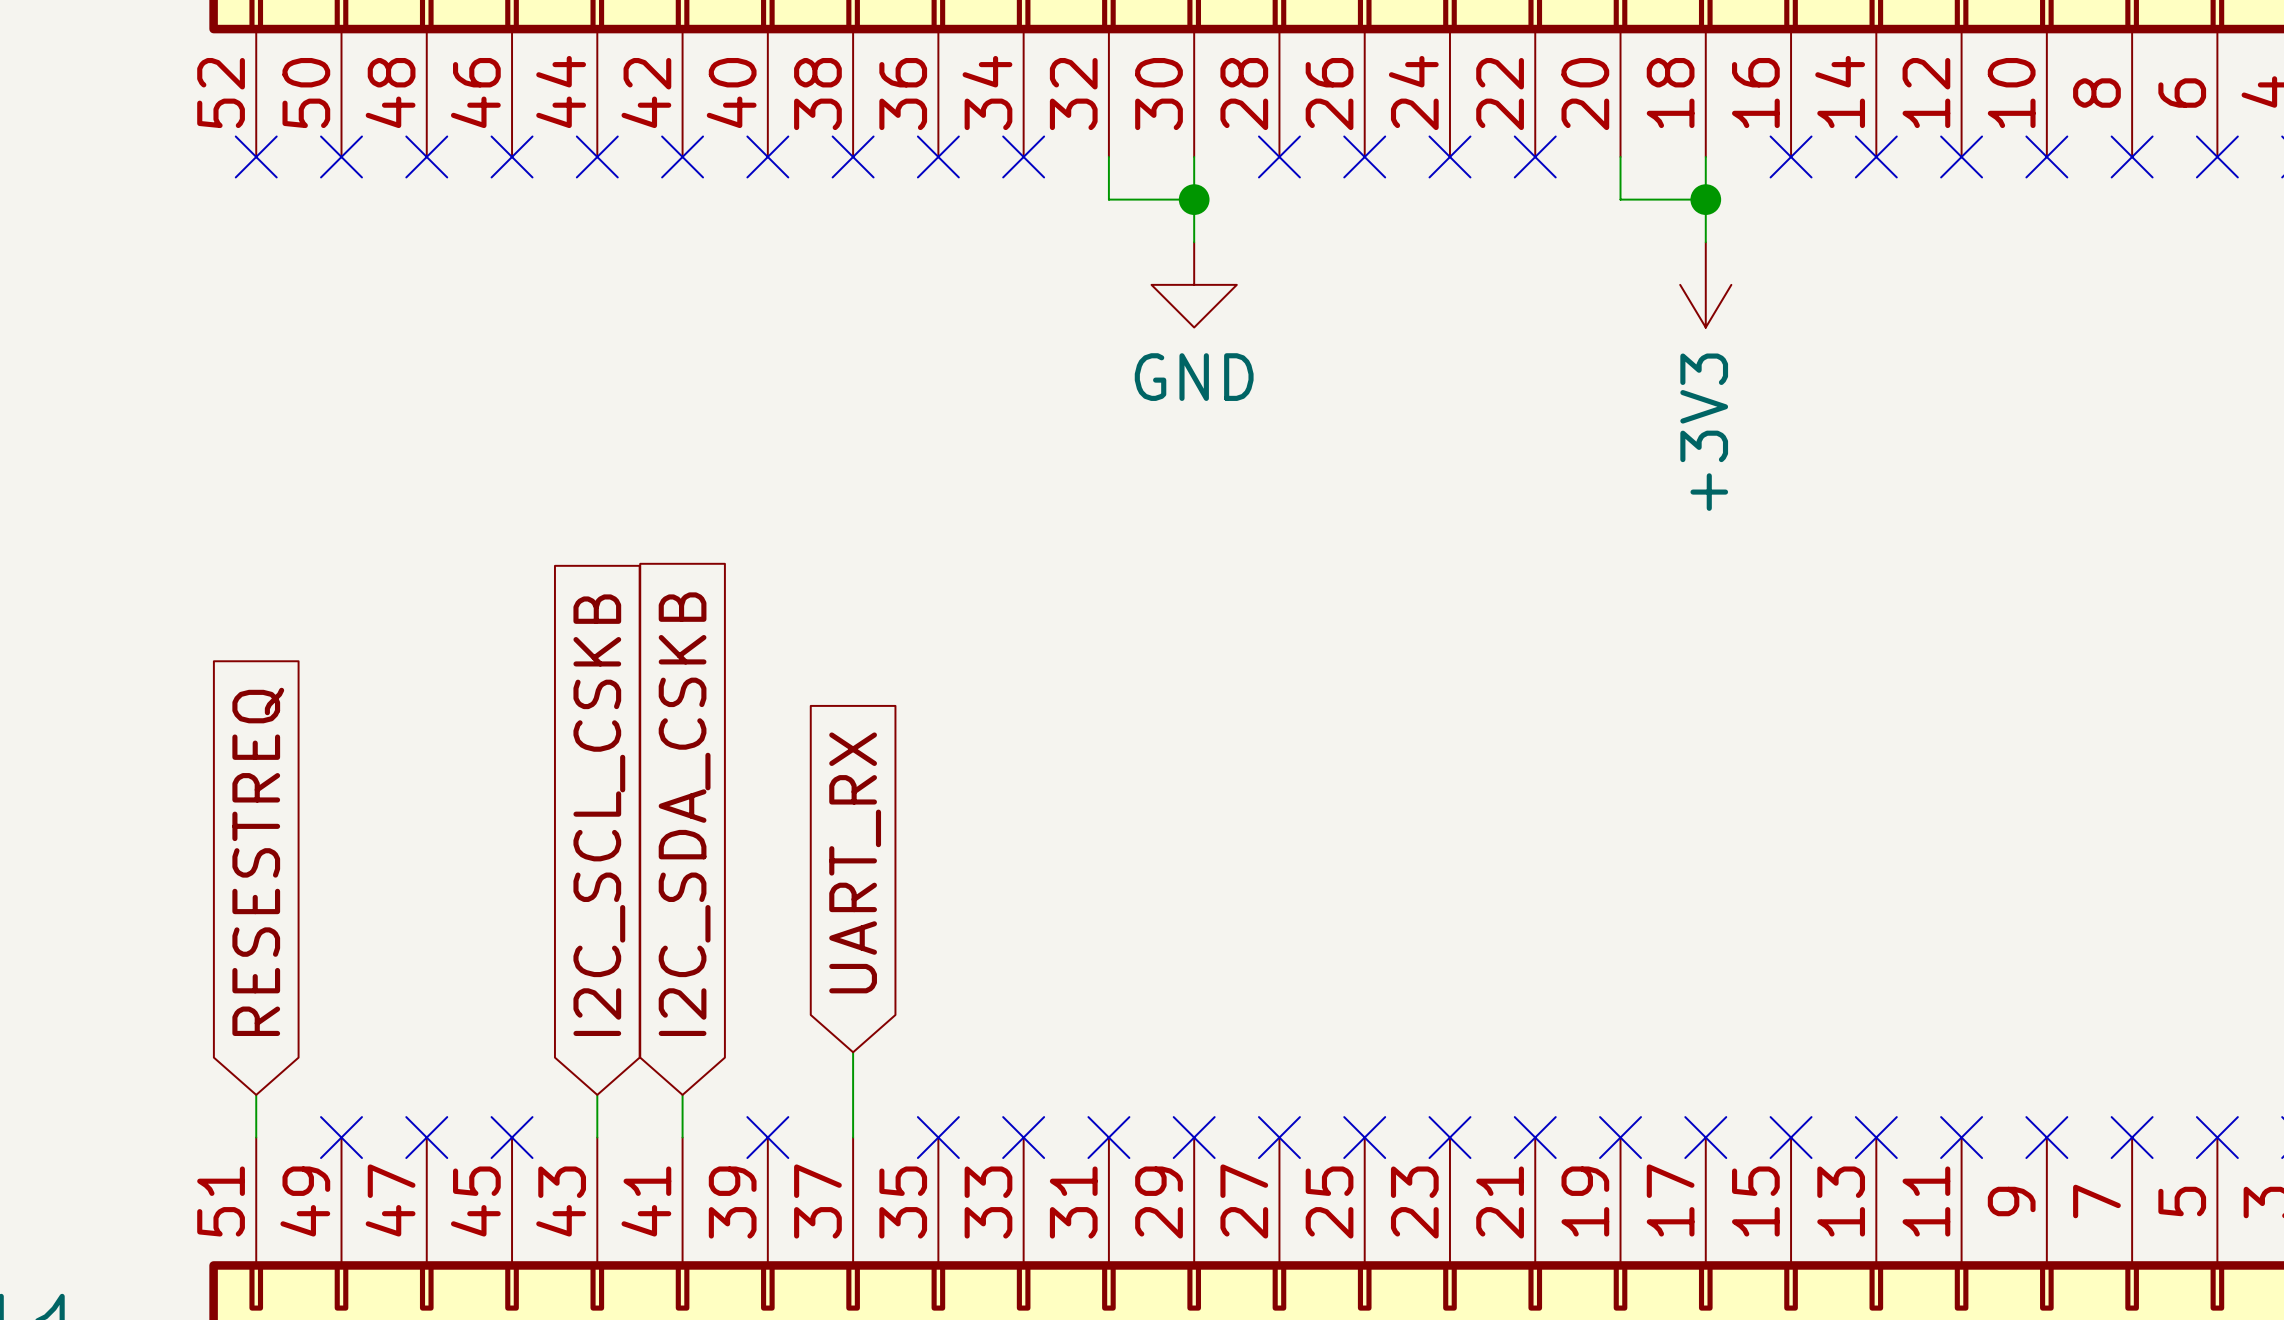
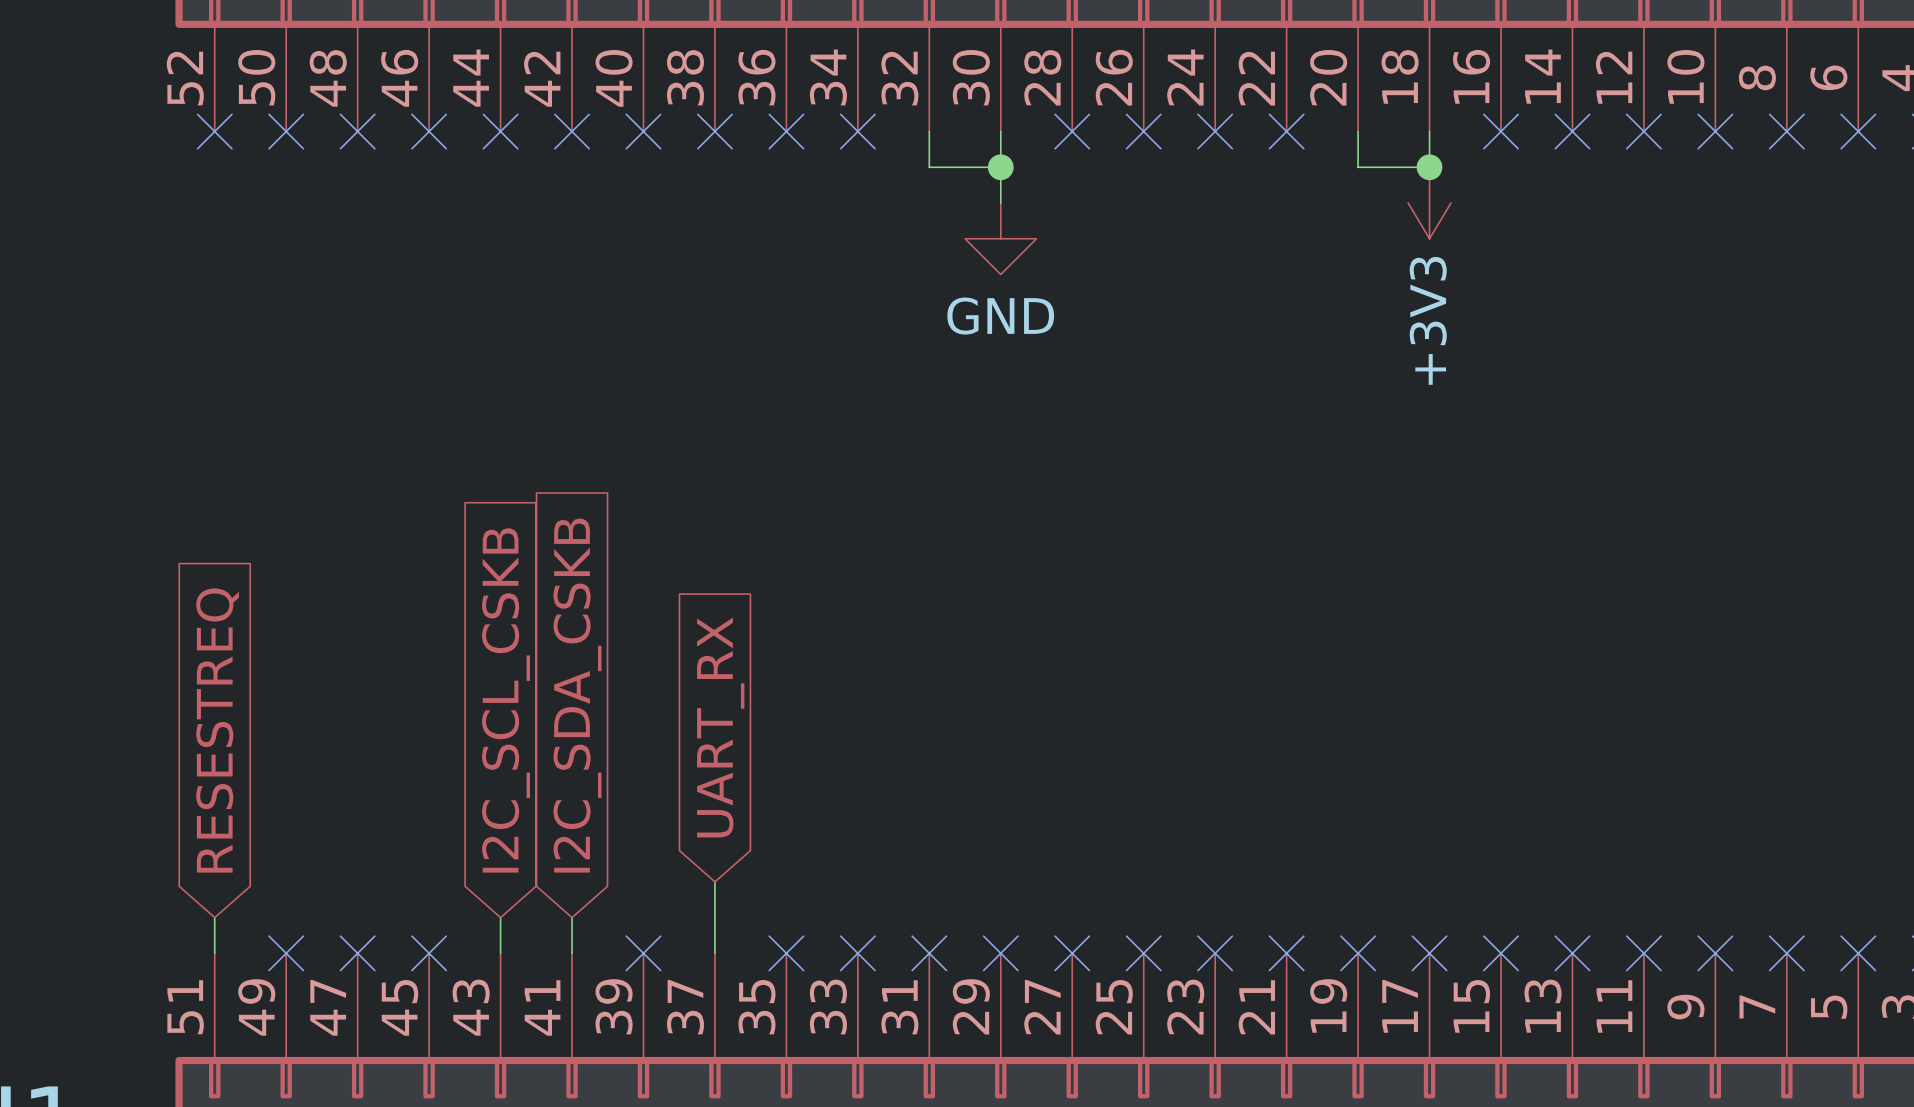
power symbol position: +3V3 (1705, 284) -> +3V3 (1429, 203)

